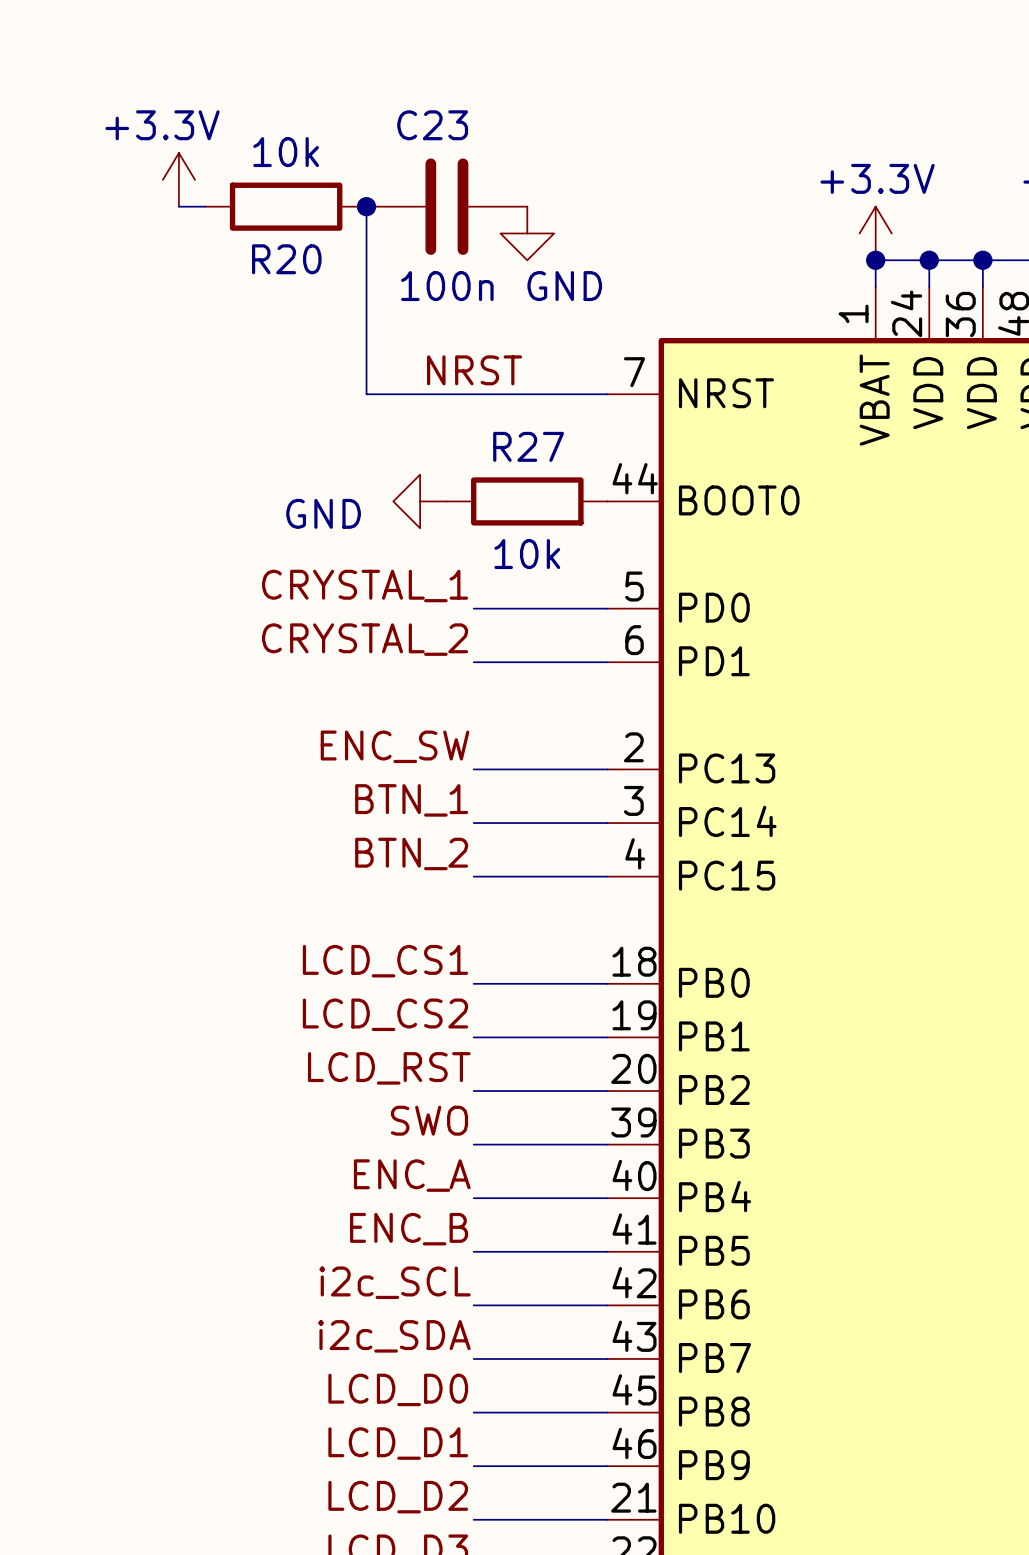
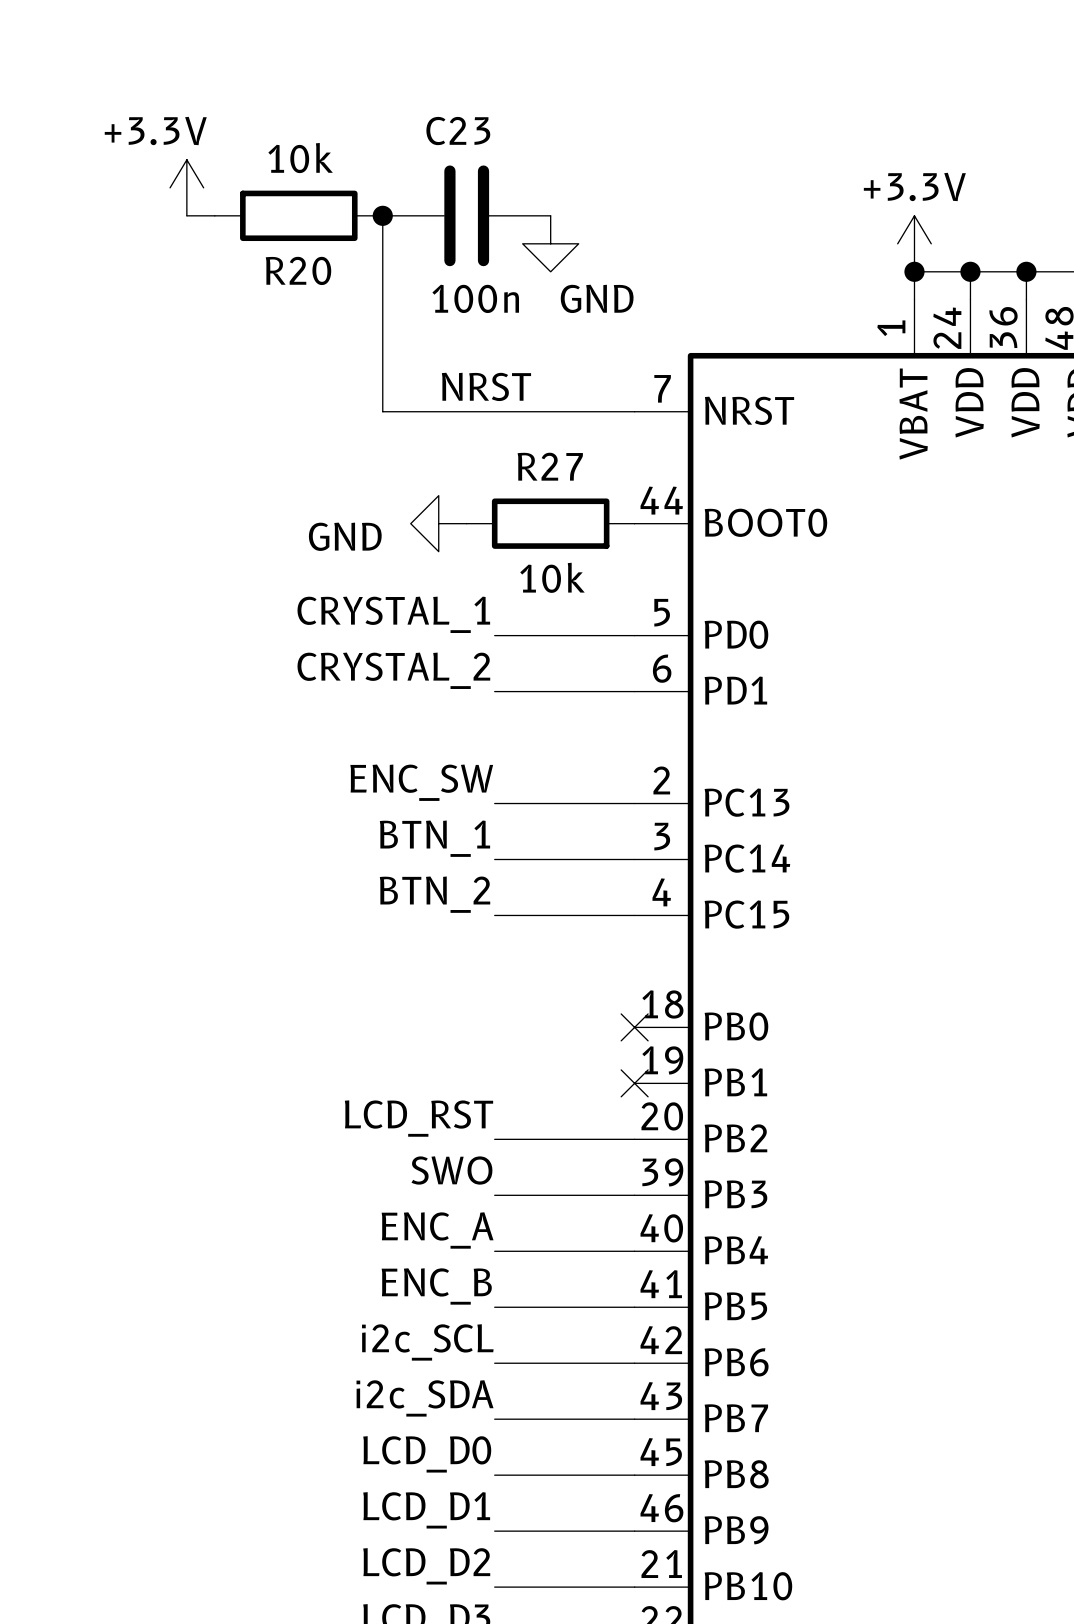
label: LCD_CS1 (385, 961) -> none
wire: (473, 983) (607, 983) -> none
no-connect mark: none -> (634, 1027)
label: LCD_CS2 (385, 1014) -> none
wire: (473, 1037) (607, 1037) -> none
no-connect mark: none -> (634, 1083)

